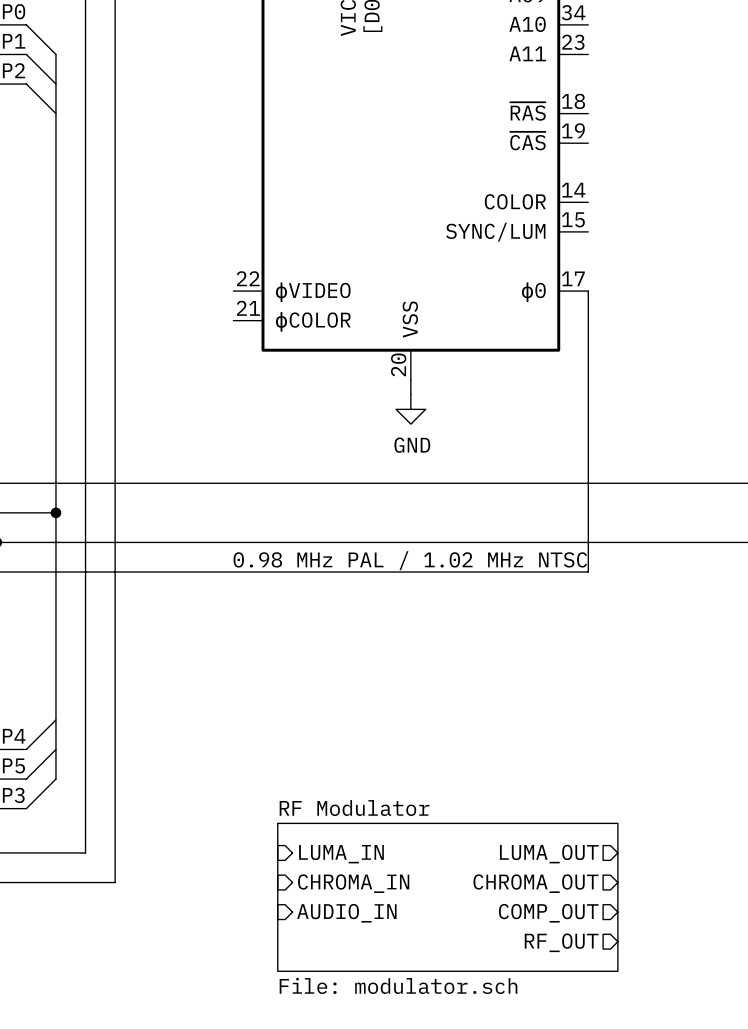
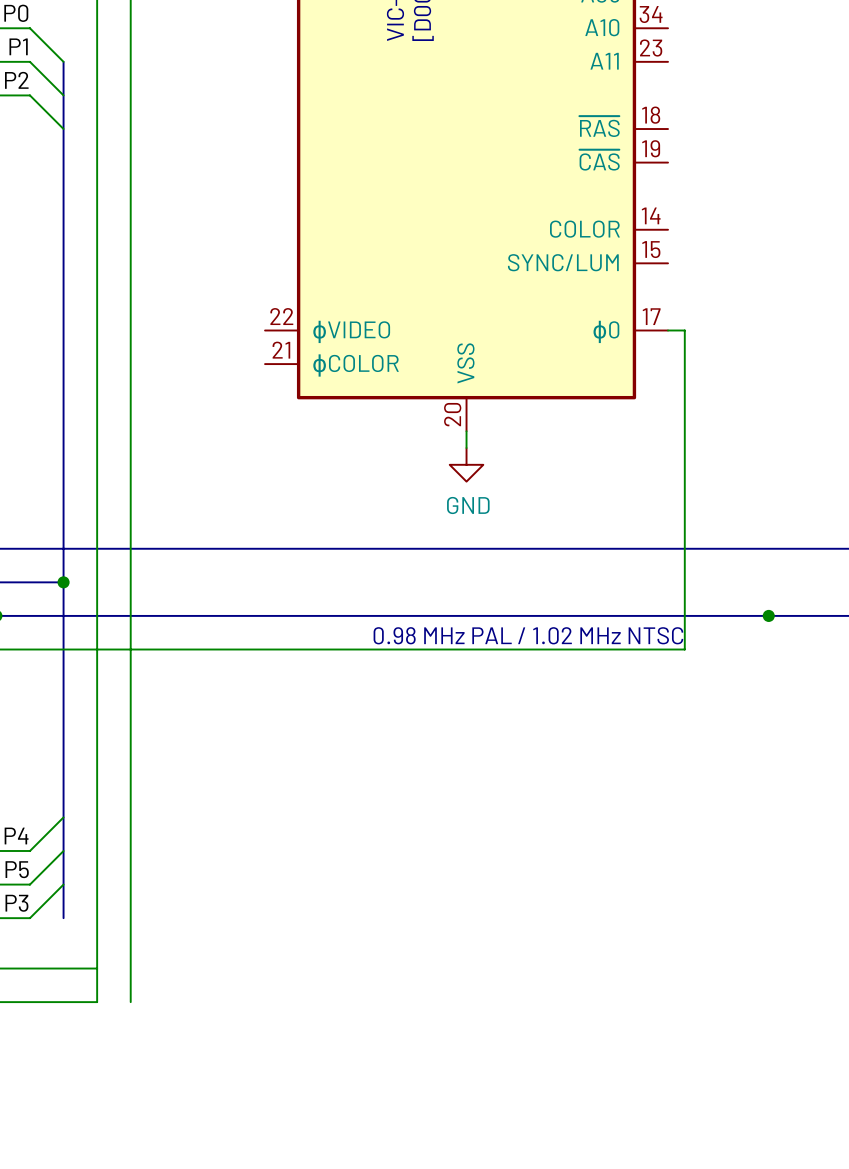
wire: (588, 291) (588, 572) -> (668, 330) (684, 330) (684, 649) (668, 649)
junction: none -> (768, 615)
text position: 0.98 MHz PAL / 1.02 MHz NTSC (410, 560) -> 0.98 MHz PAL / 1.02 MHz NTSC (528, 635)
bus: none -> (63, 884) (63, 918)
sheet pin: LUMA_IN (341, 854) -> none
sheet pin: LUMA_OUT (549, 854) -> none
wire: (85, 882) (115, 882) -> (97, 1002) (97, 968)
sheet pin: CHROMA_IN (353, 883) -> none
sheet pin: CHROMA_OUT (536, 883) -> none
sheet RF Modulator: File: modulator.sch (447, 897) -> none
sheet pin: AUDIO_IN (346, 913) -> none
sheet pin: COMP_OUT (548, 913) -> none
sheet pin: RF_OUT (561, 942) -> none

